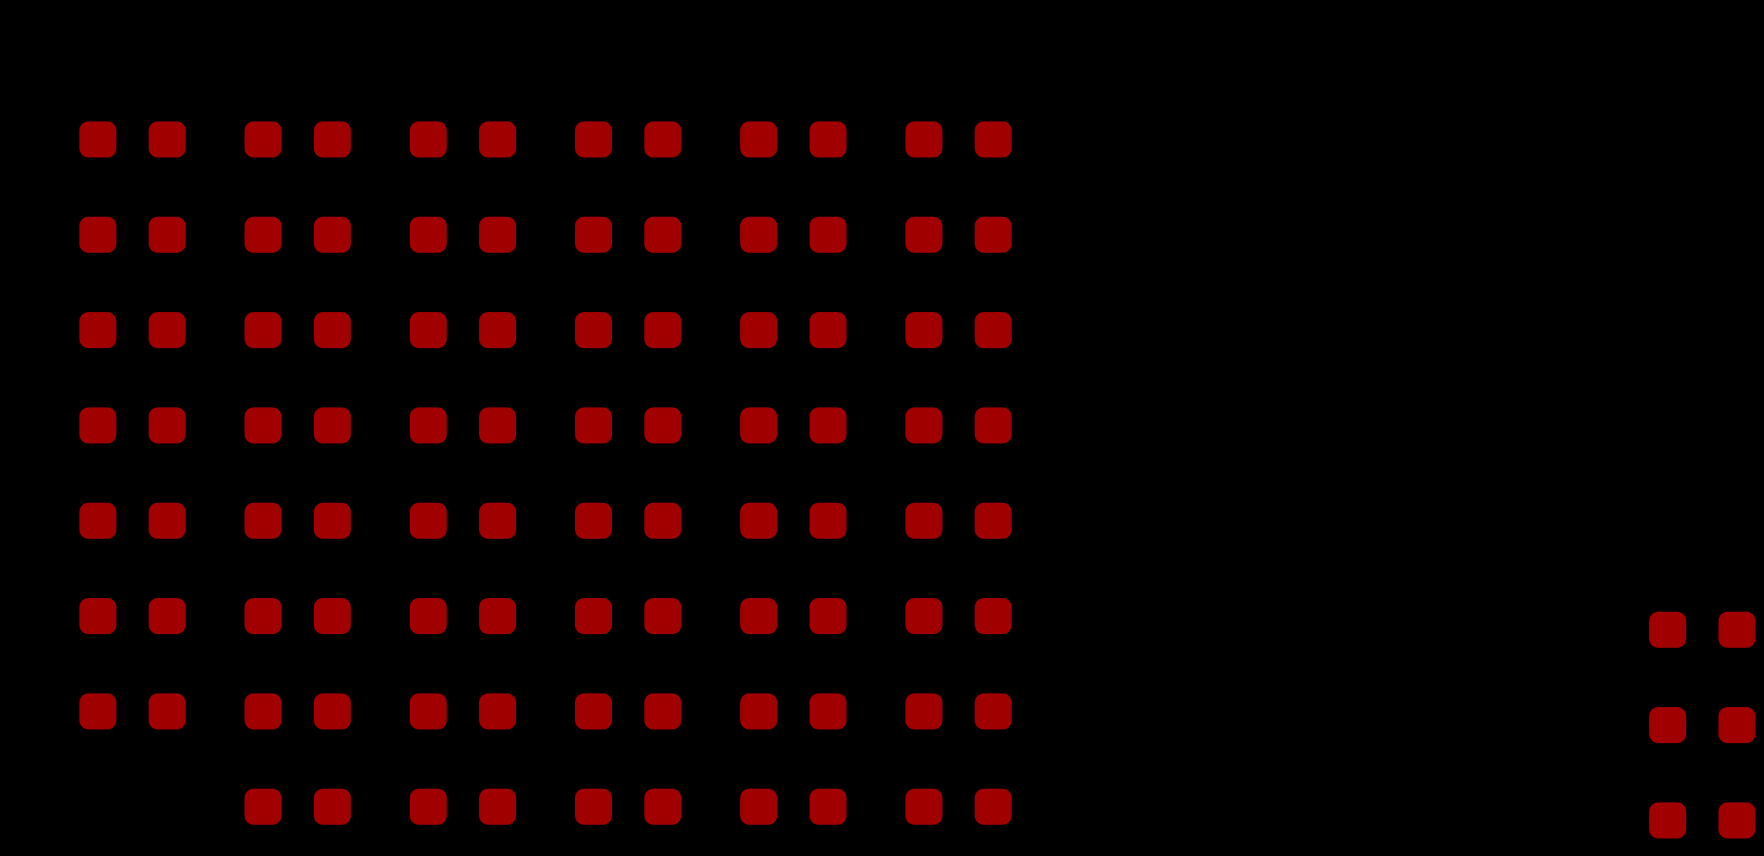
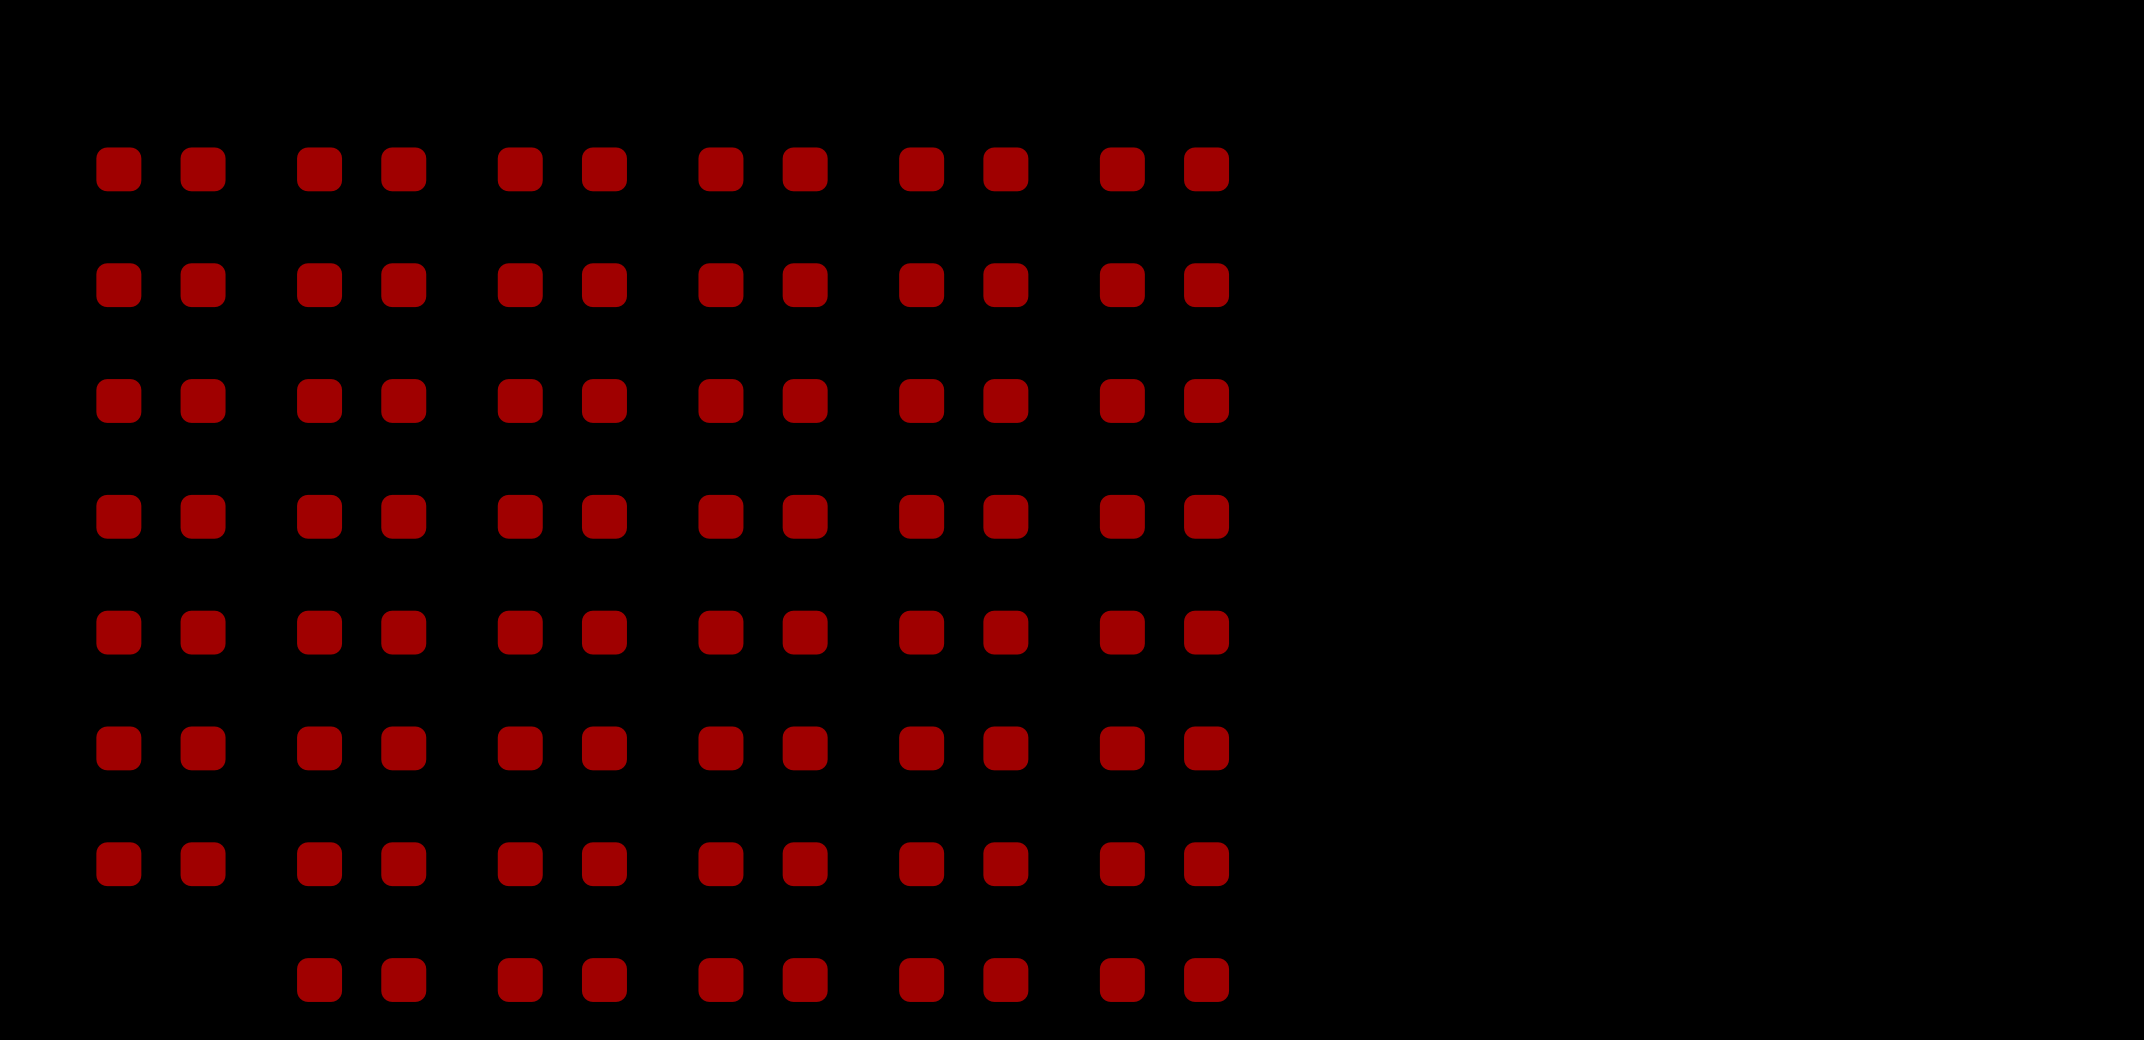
part: (1702, 629) -> none
part: (1702, 725) -> none
part: (1702, 820) -> none

